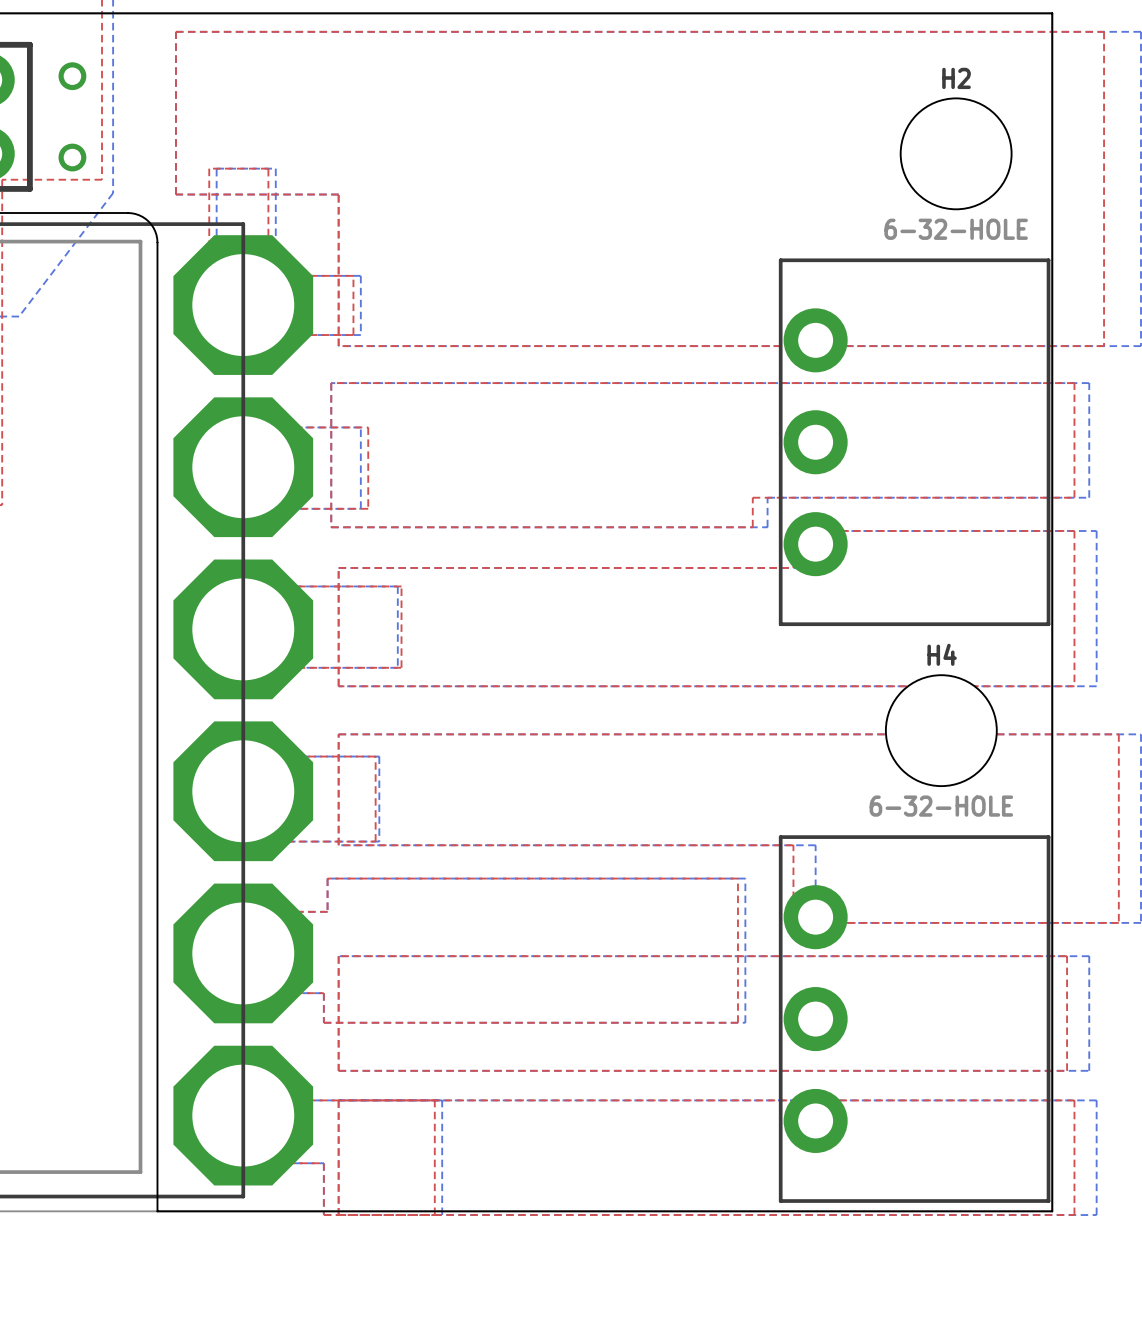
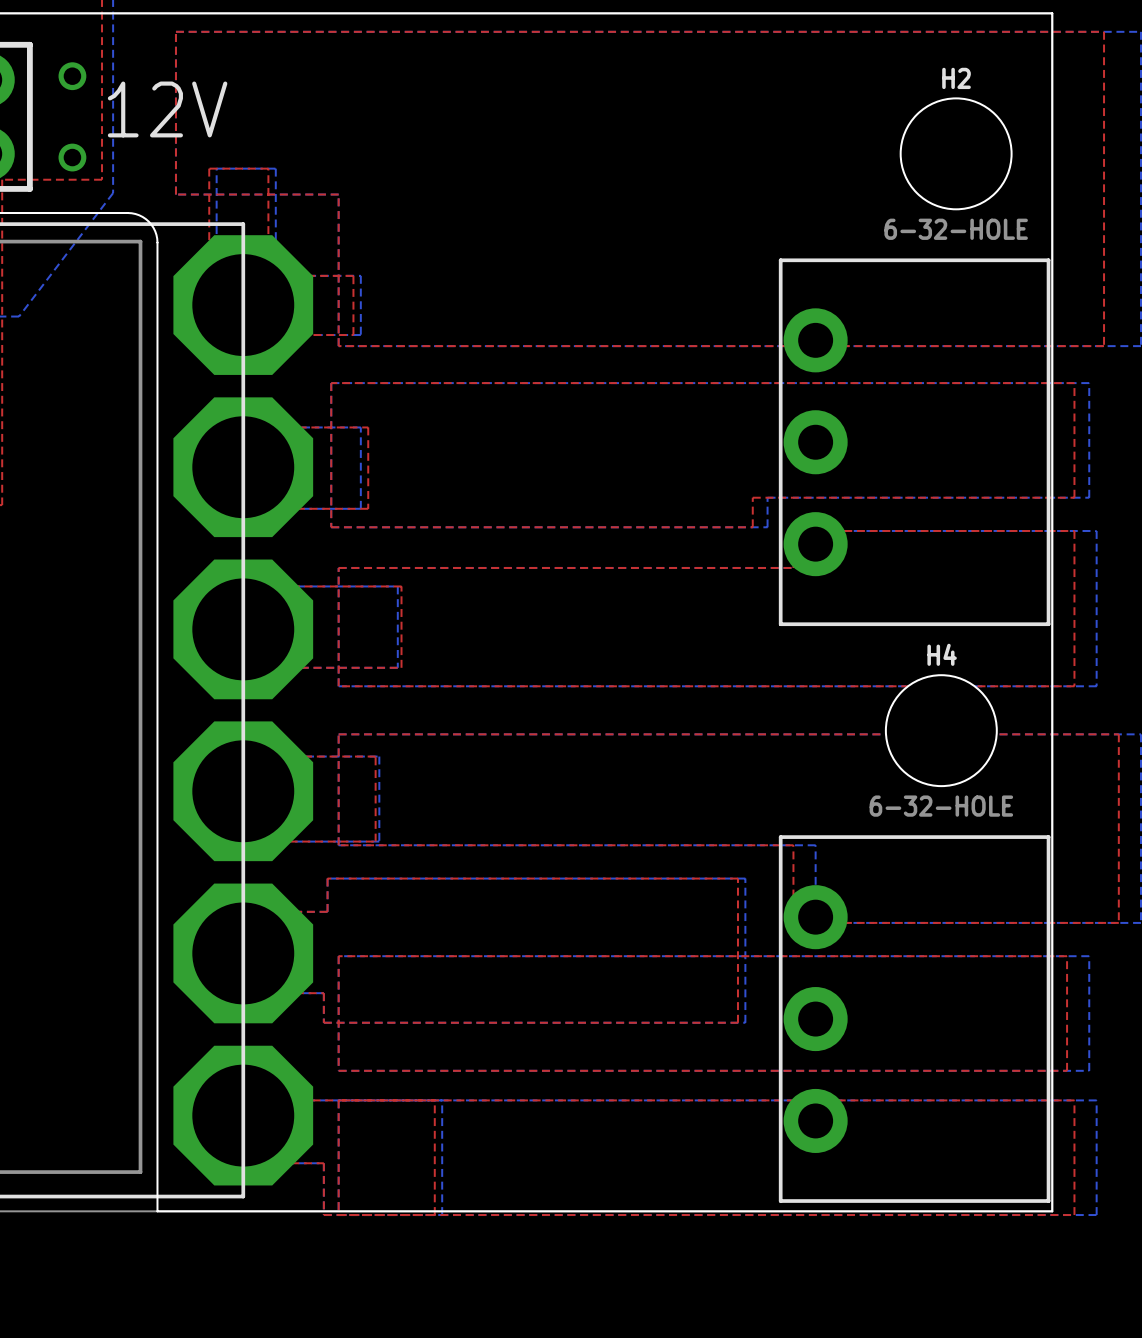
text: none -> 12V (167, 109)

